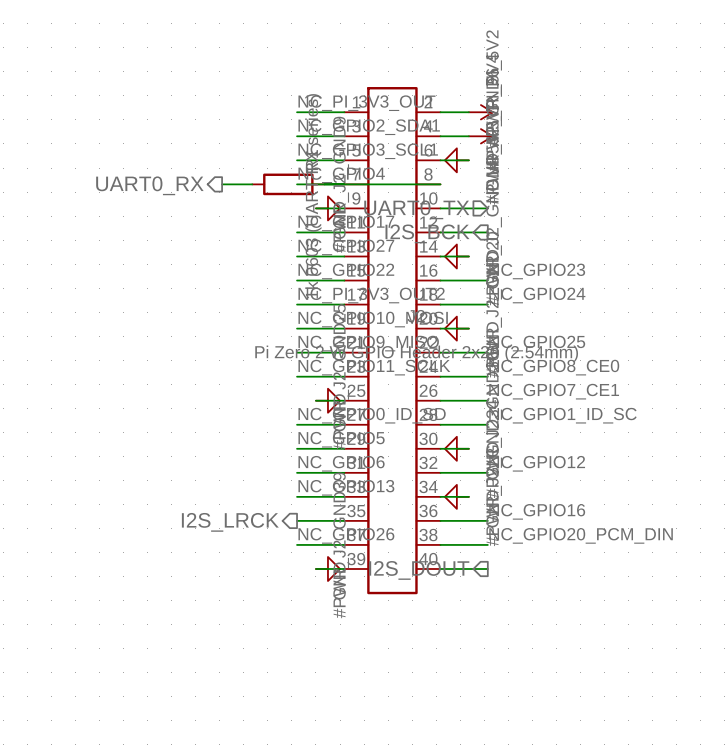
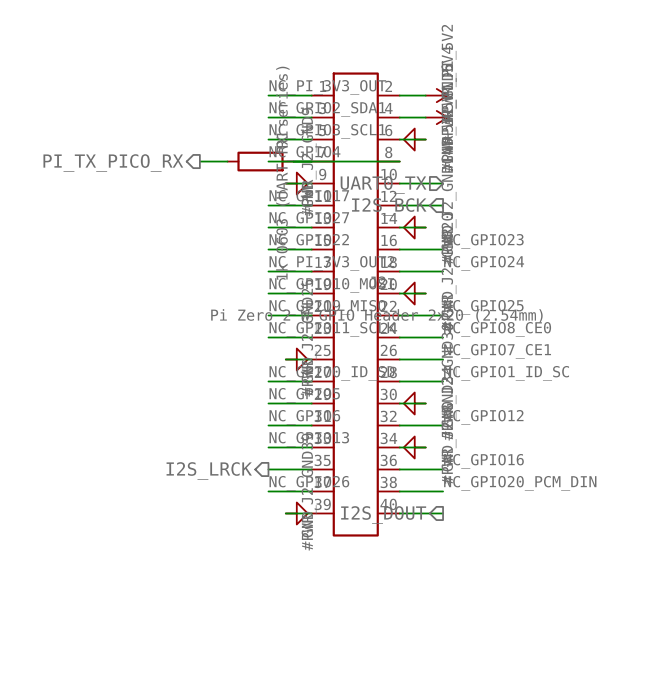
hierarchical label: UART0_RX (149, 185) -> PI_TX_PICO_RX (113, 163)

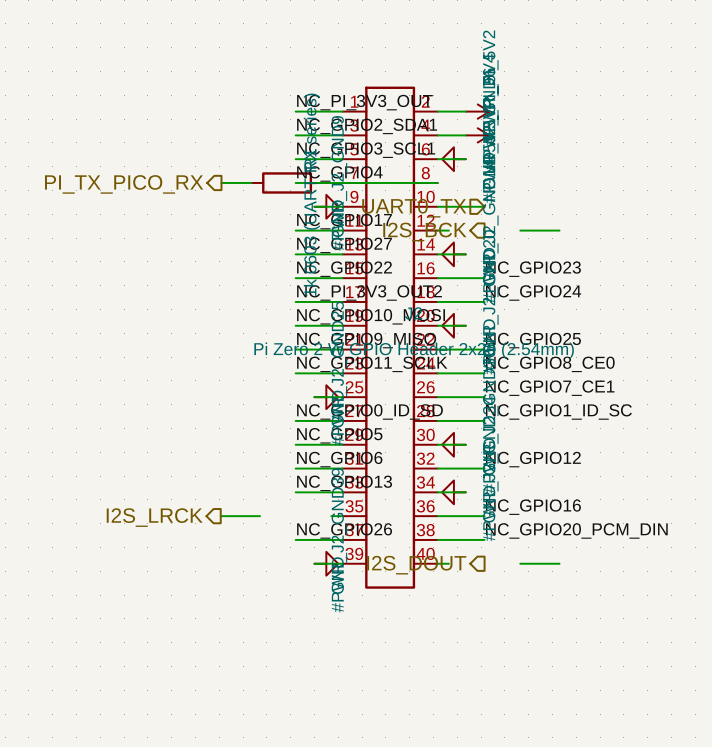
wire: (410, 205) (443, 205) -> none
wire: none -> (520, 230) (559, 230)
wire: none -> (220, 516) (259, 516)
wire: (268, 469) (301, 469) -> none
hierarchical label position: I2S_LRCK (209, 471) -> I2S_LRCK (154, 517)
wire: (410, 513) (443, 513) -> none
wire: none -> (520, 563) (559, 563)

